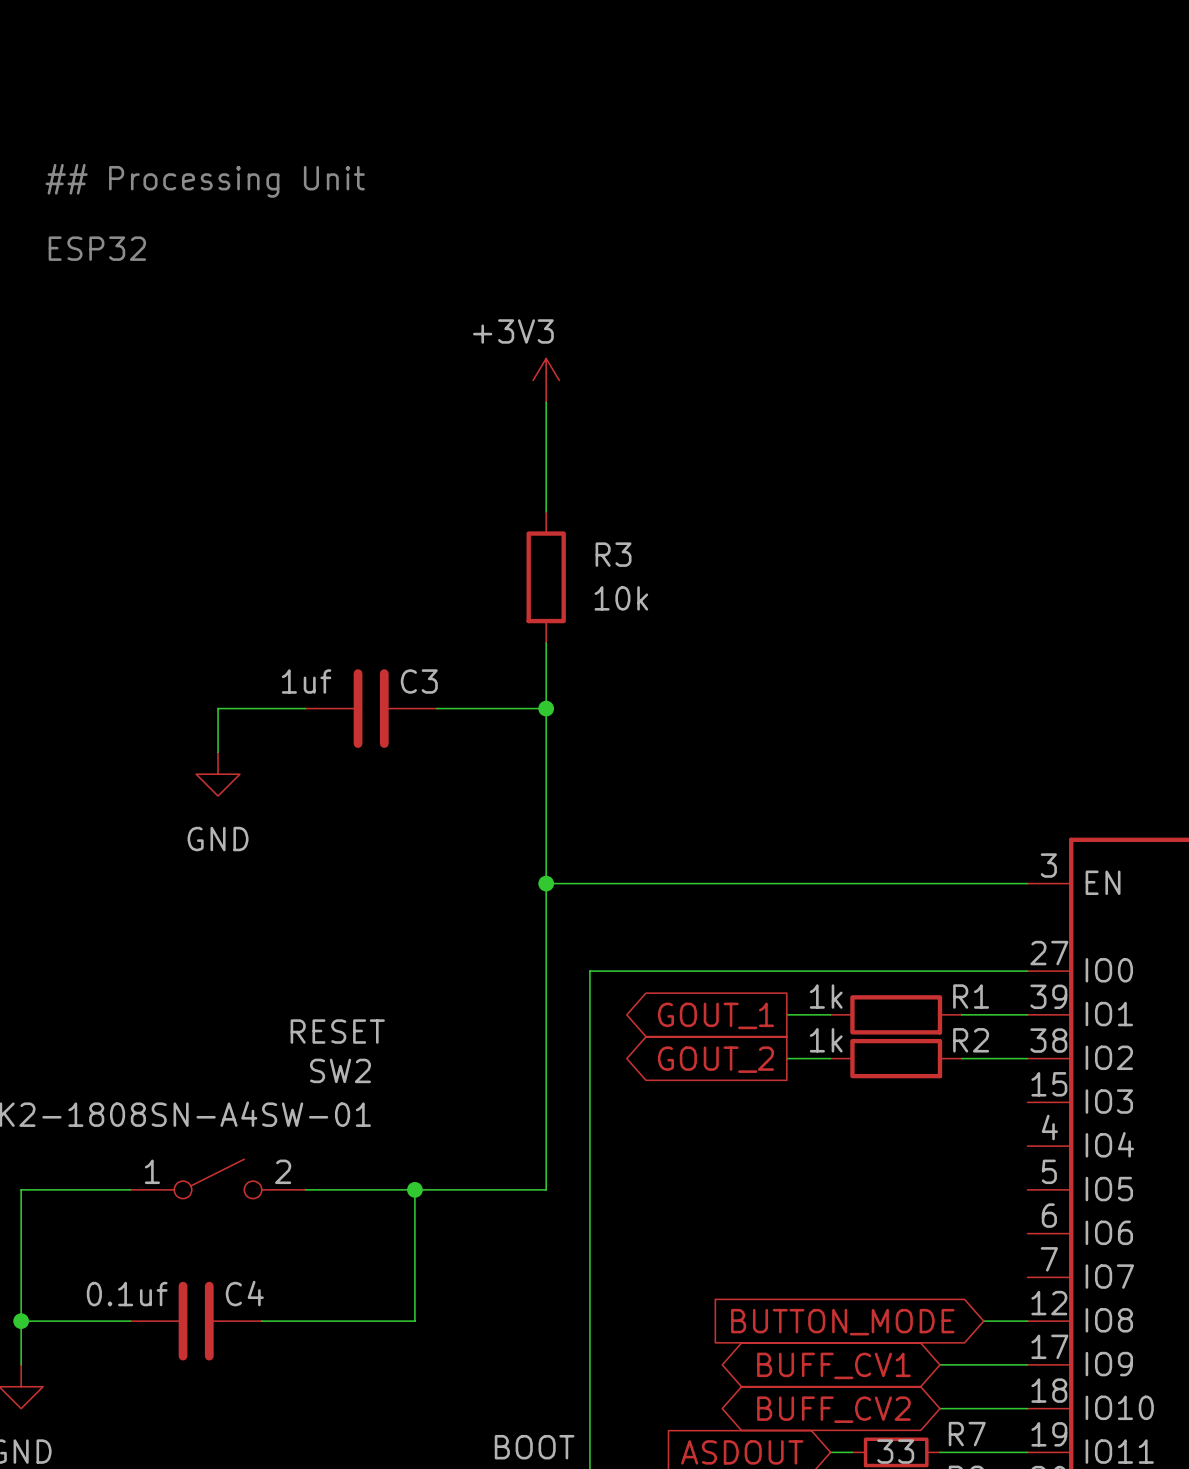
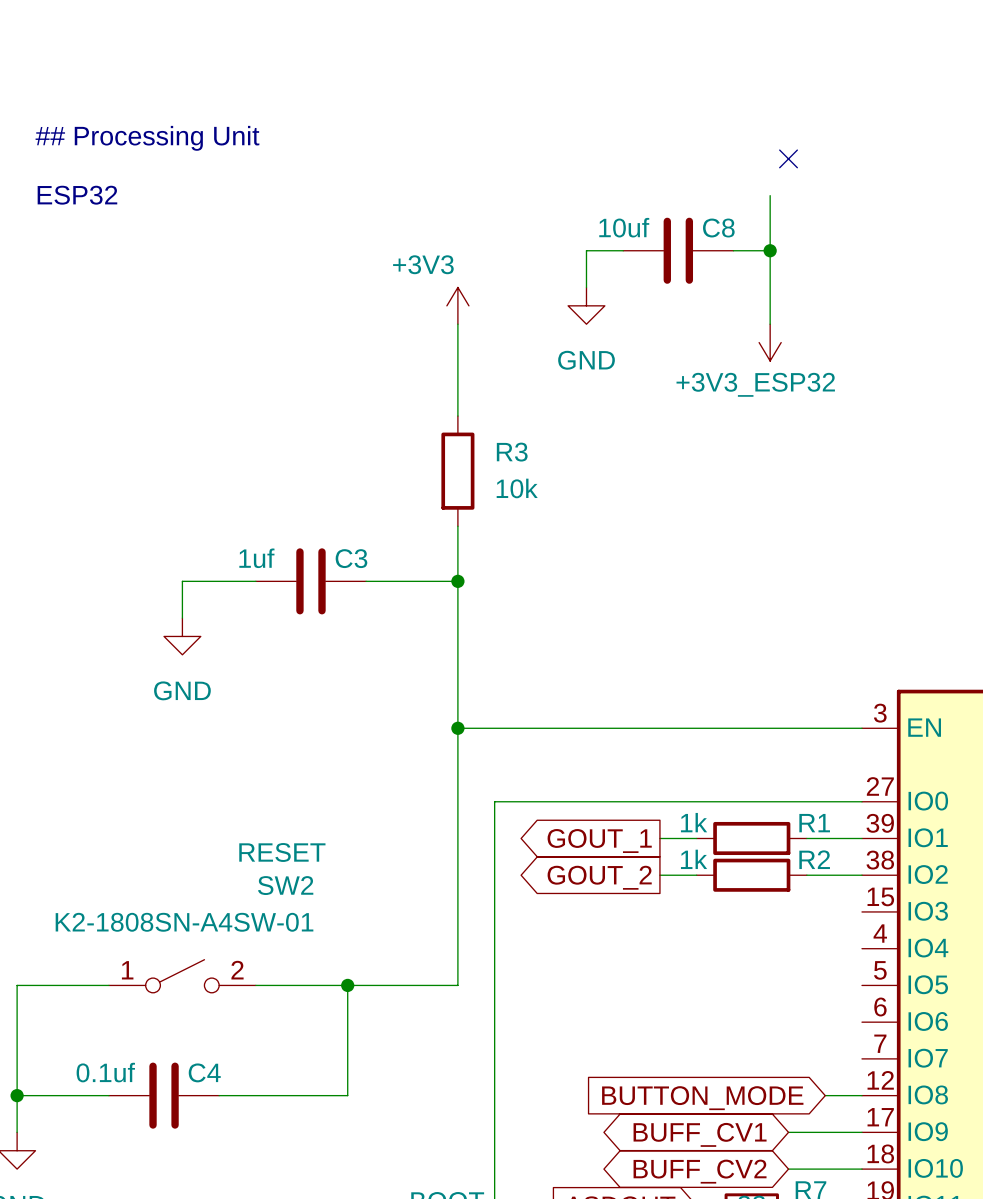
no-connect mark: none -> (788, 158)
wire: none -> (770, 195) (770, 324)
wire: none -> (623, 250) (586, 250) (586, 287)
C8: none -> 10uf (678, 250)
wire: none -> (733, 250) (770, 250)
junction: none -> (770, 250)
power symbol: none -> GND (586, 305)
power symbol: none -> +3V3_ESP32 (770, 342)

